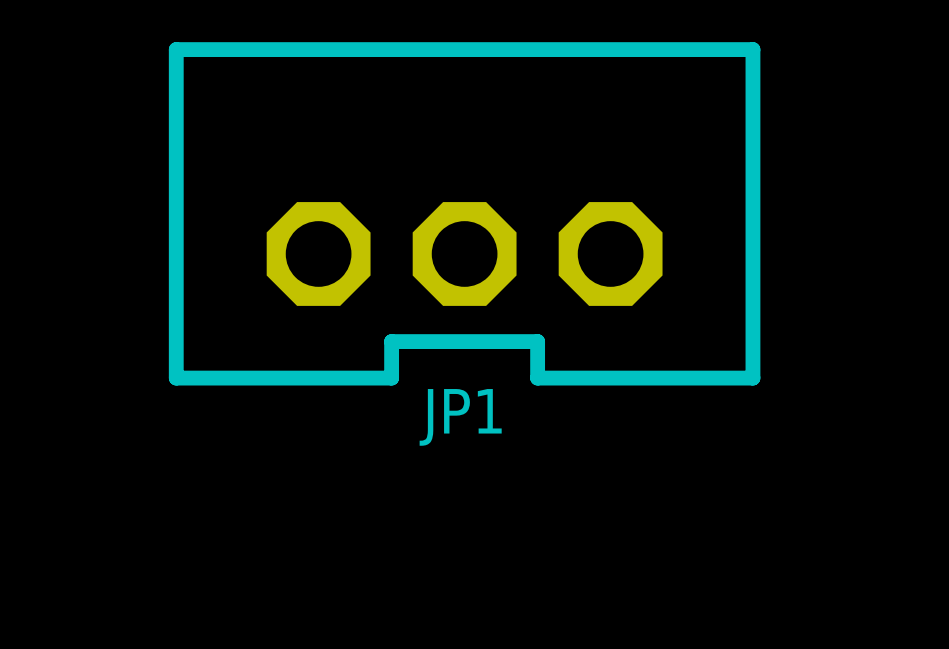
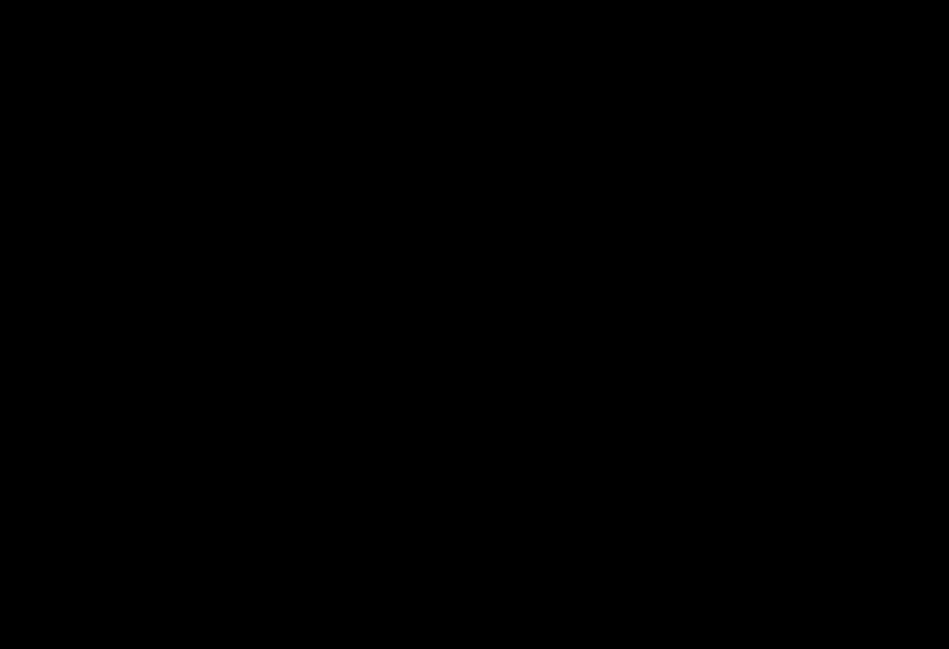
JP1: (464, 213) -> none

